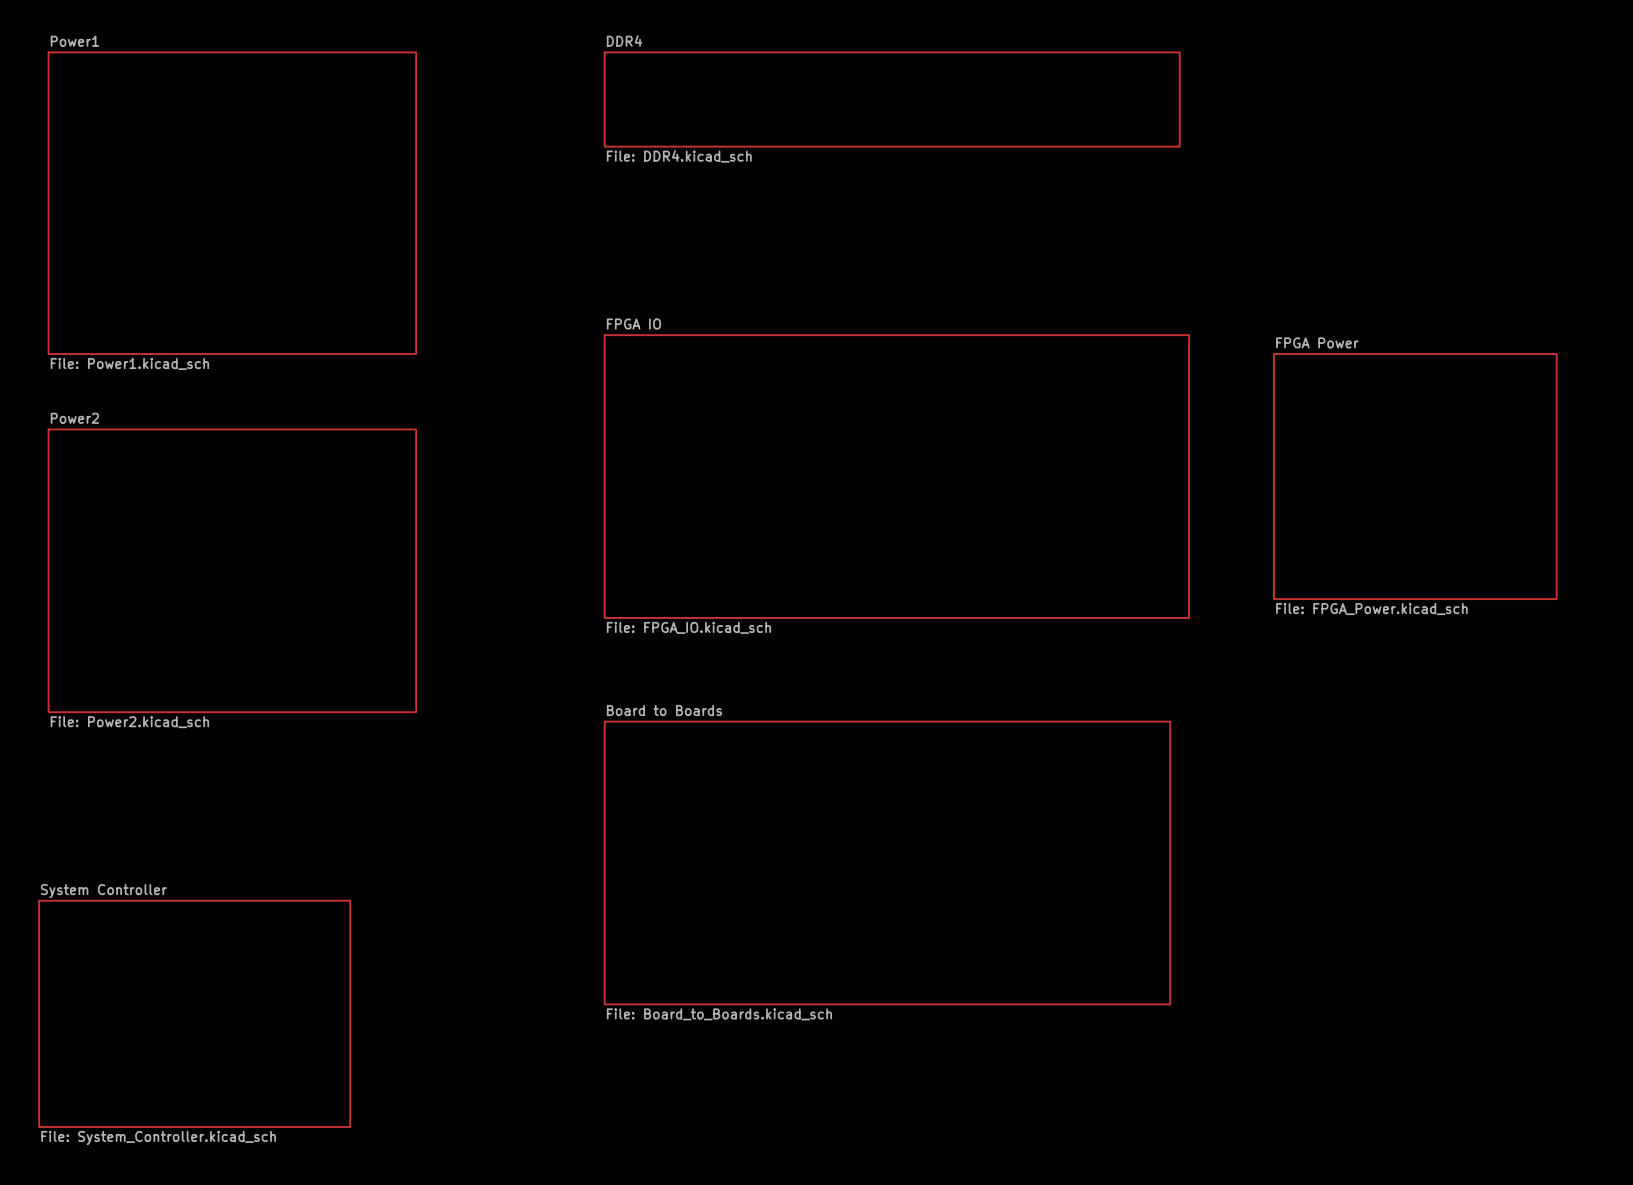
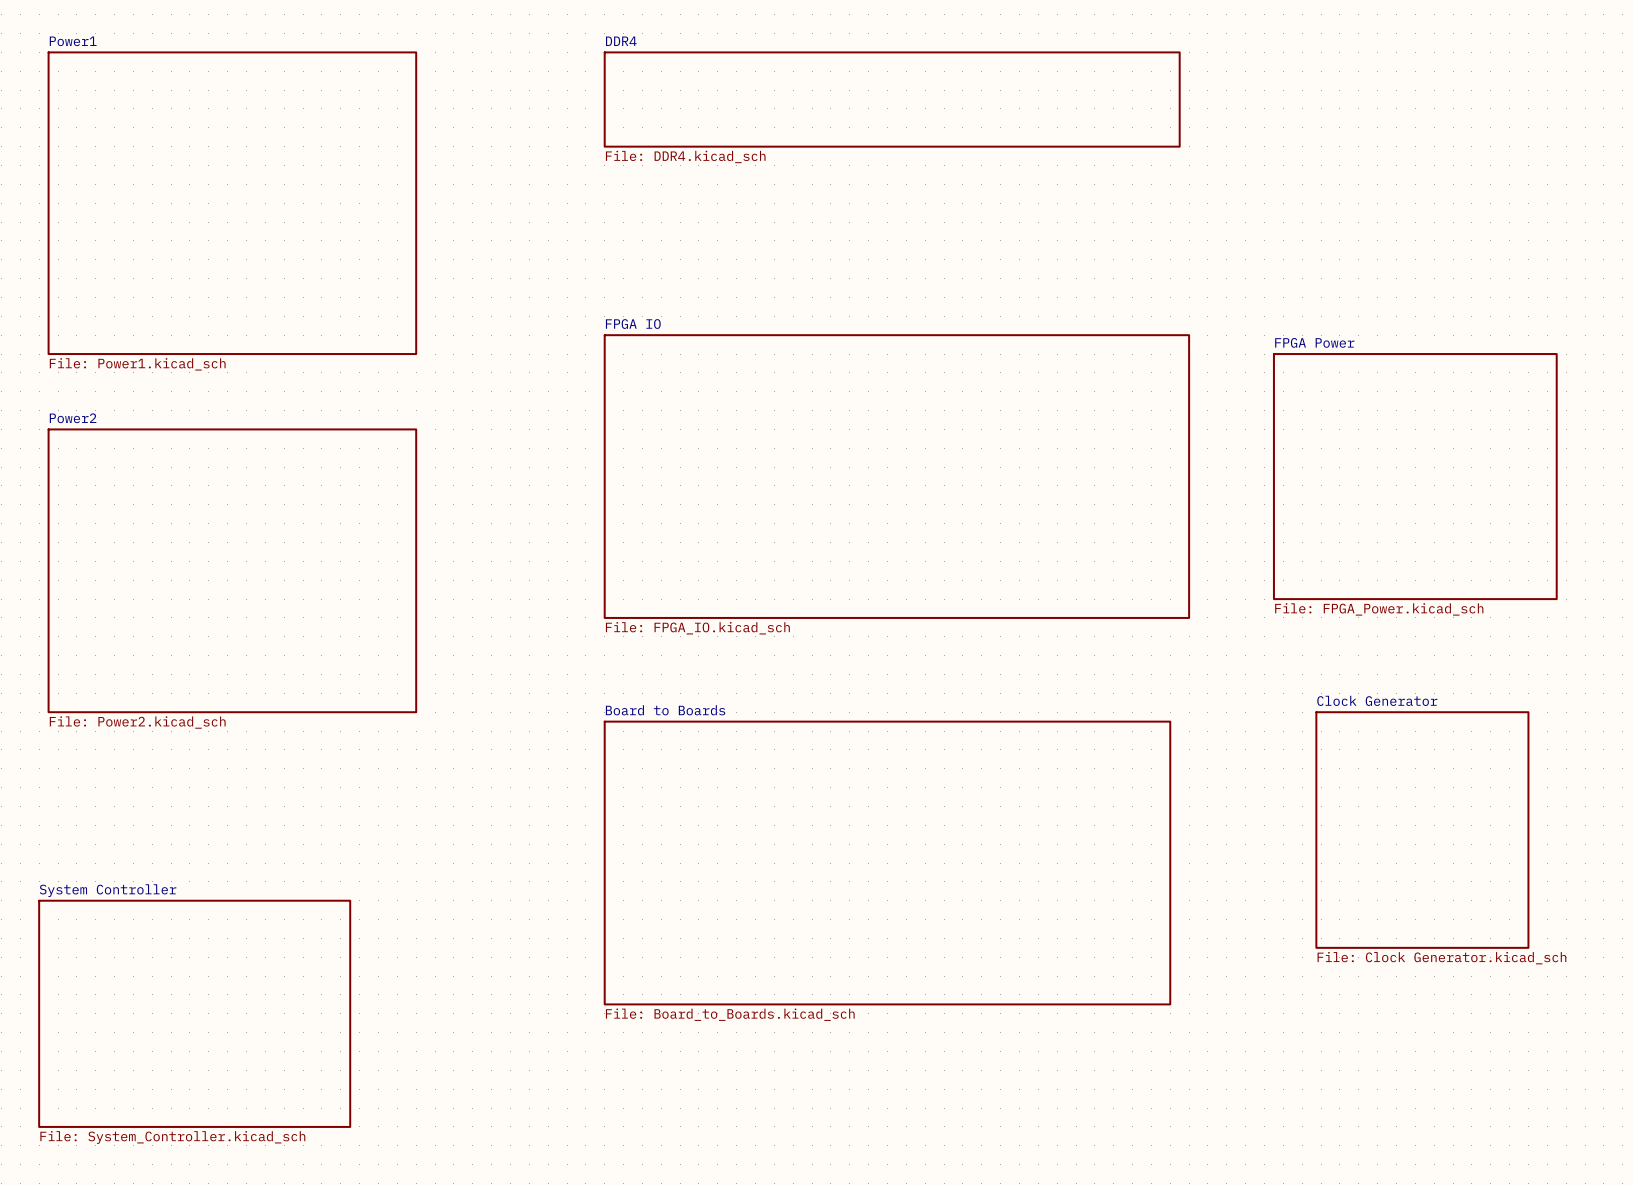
sheet Clock Generator: none -> File: Clock Generator.kicad_sch (1422, 830)

